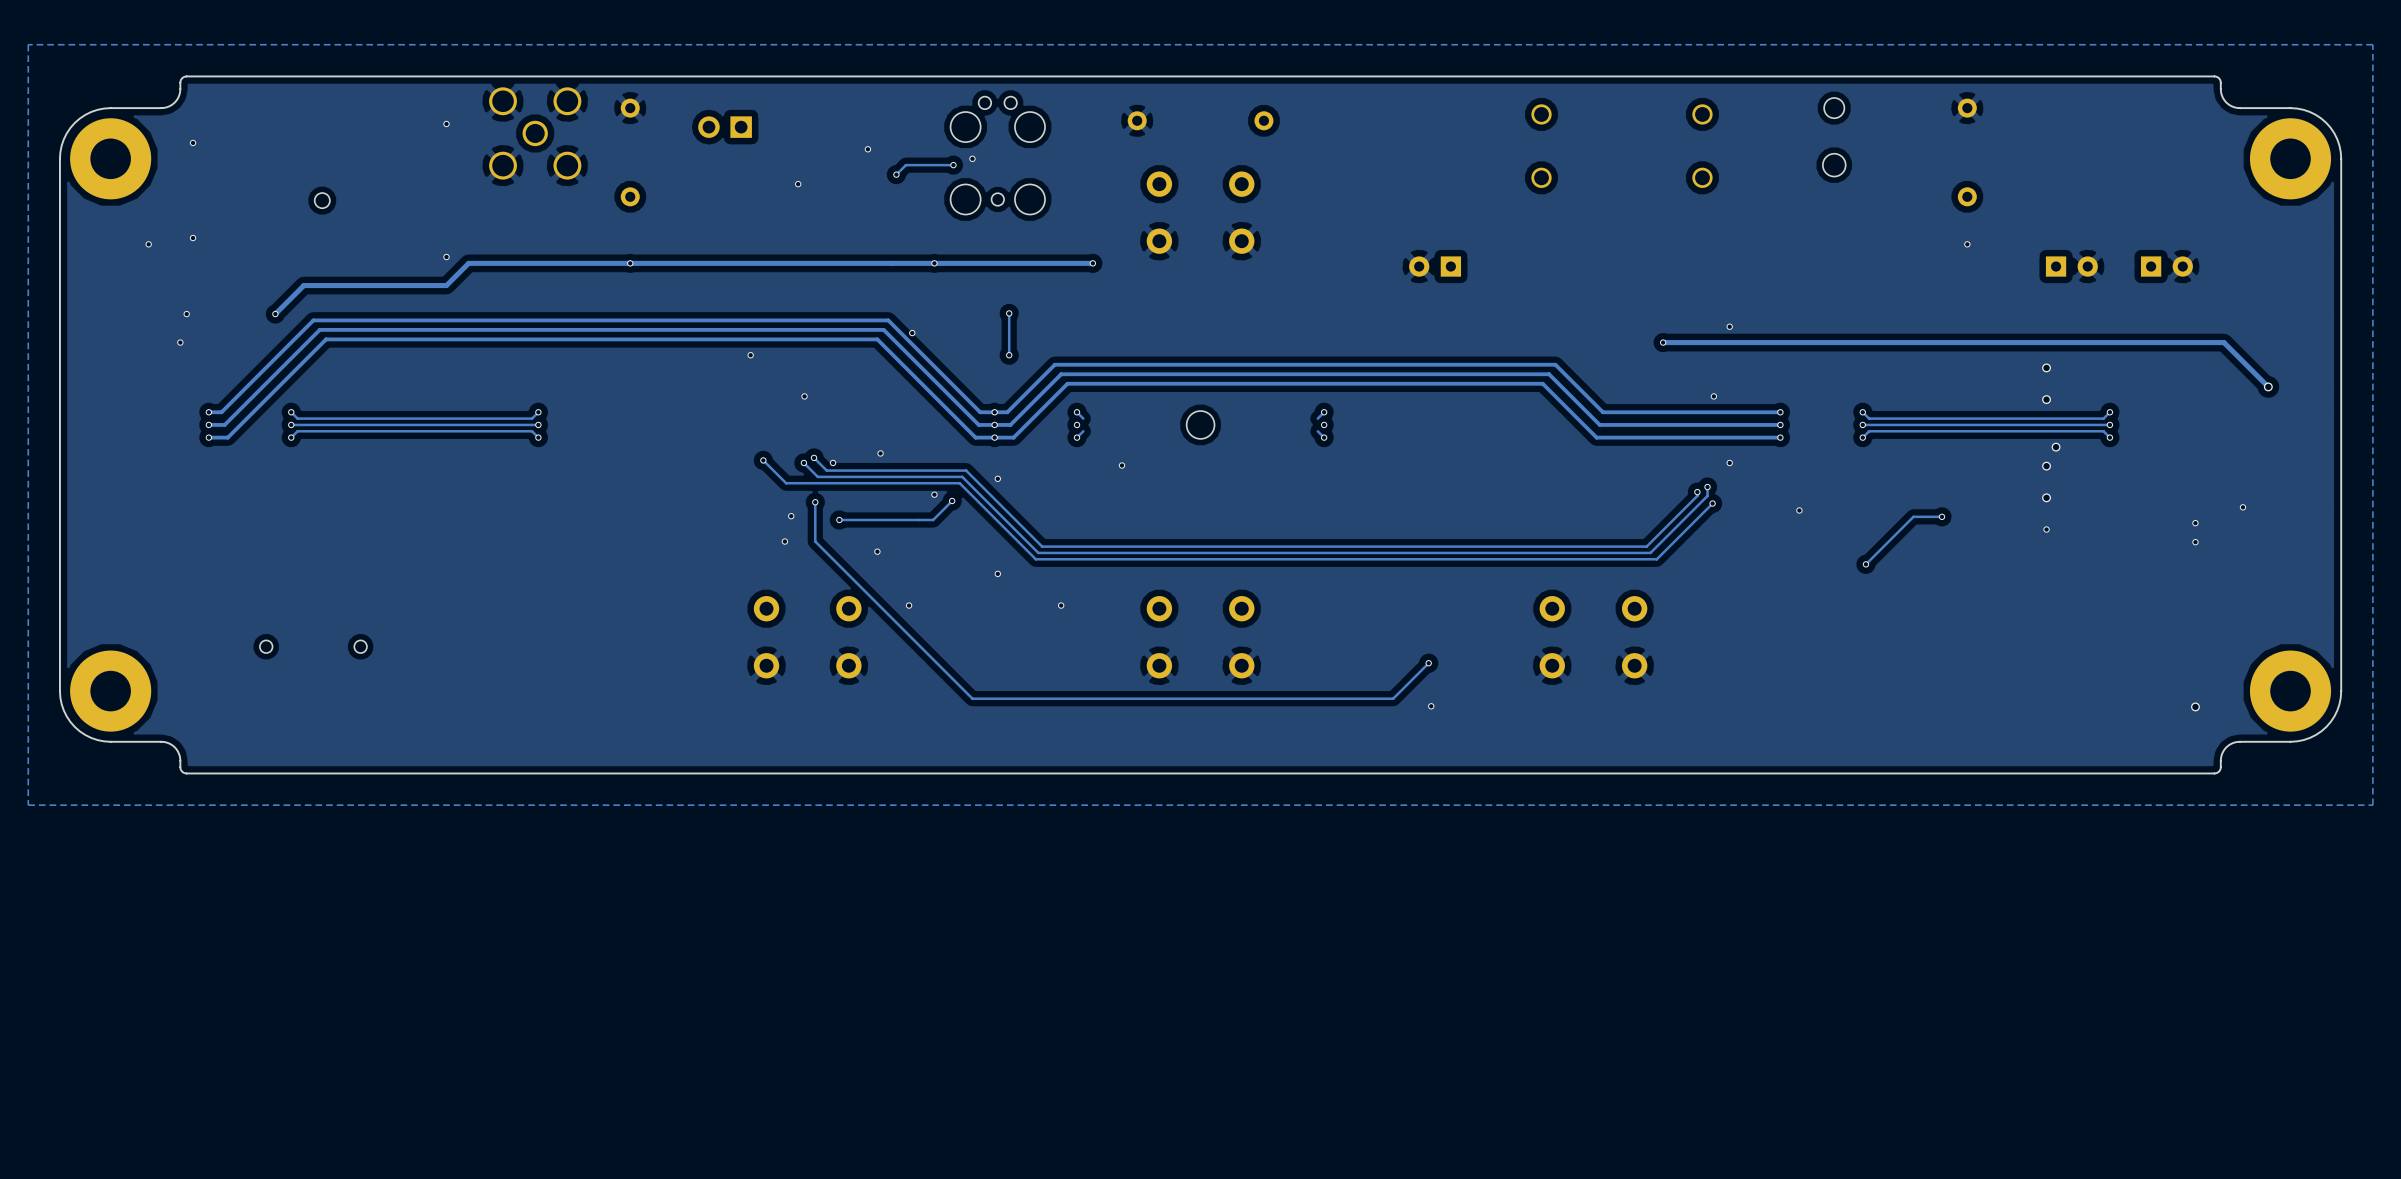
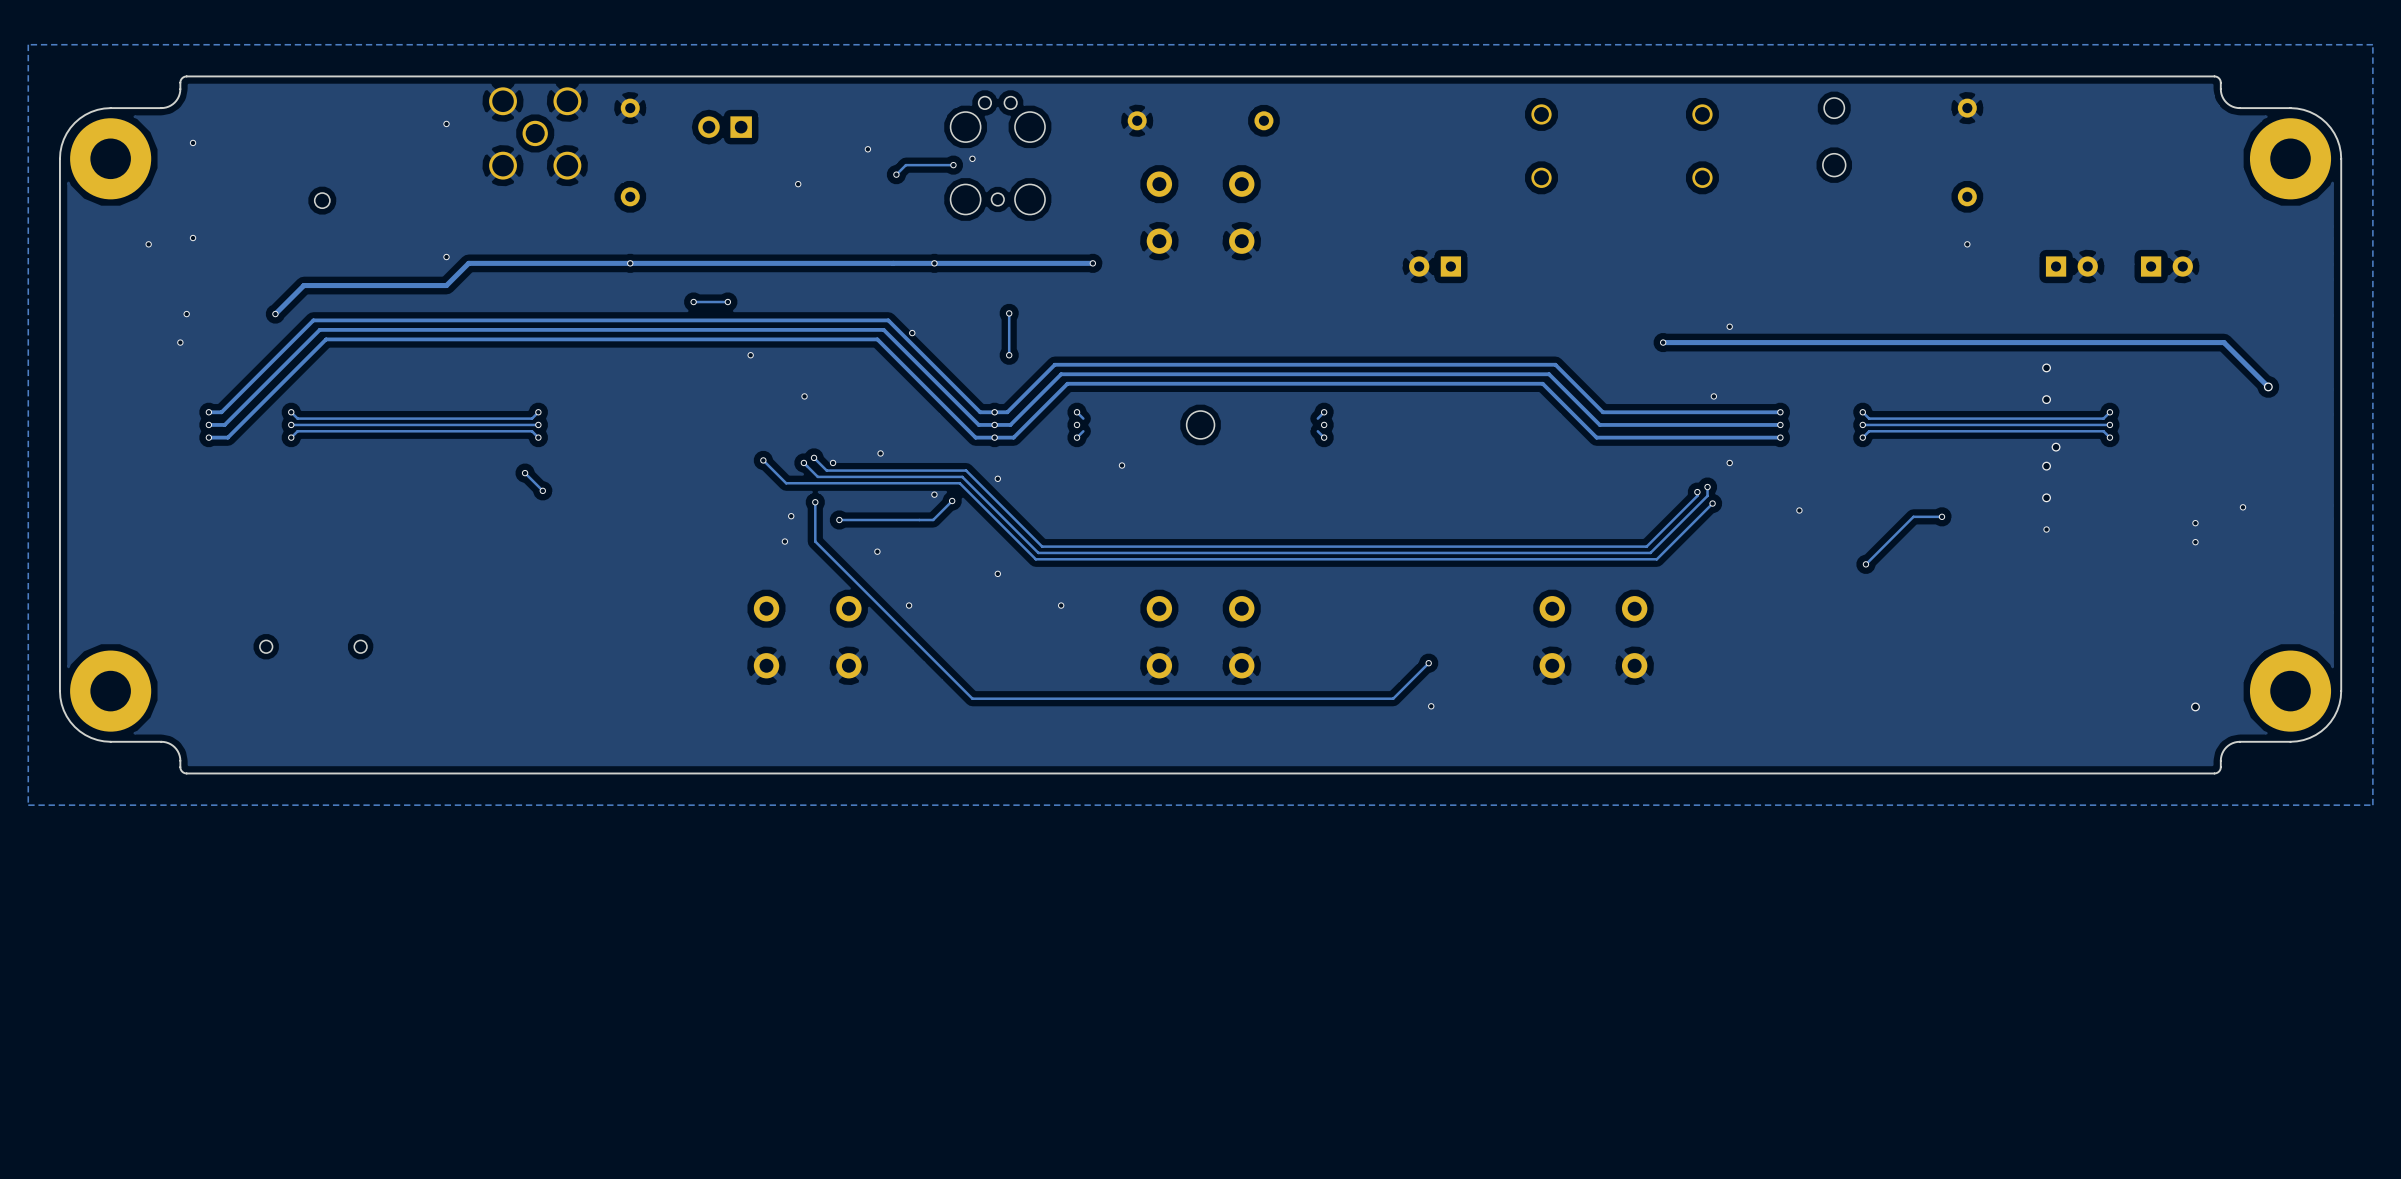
via: none -> (693, 302)
track: none -> (727, 302) (693, 302)
via: none -> (727, 302)
track: none -> (525, 473) (542, 490)
via: none -> (525, 473)
via: none -> (542, 490)

